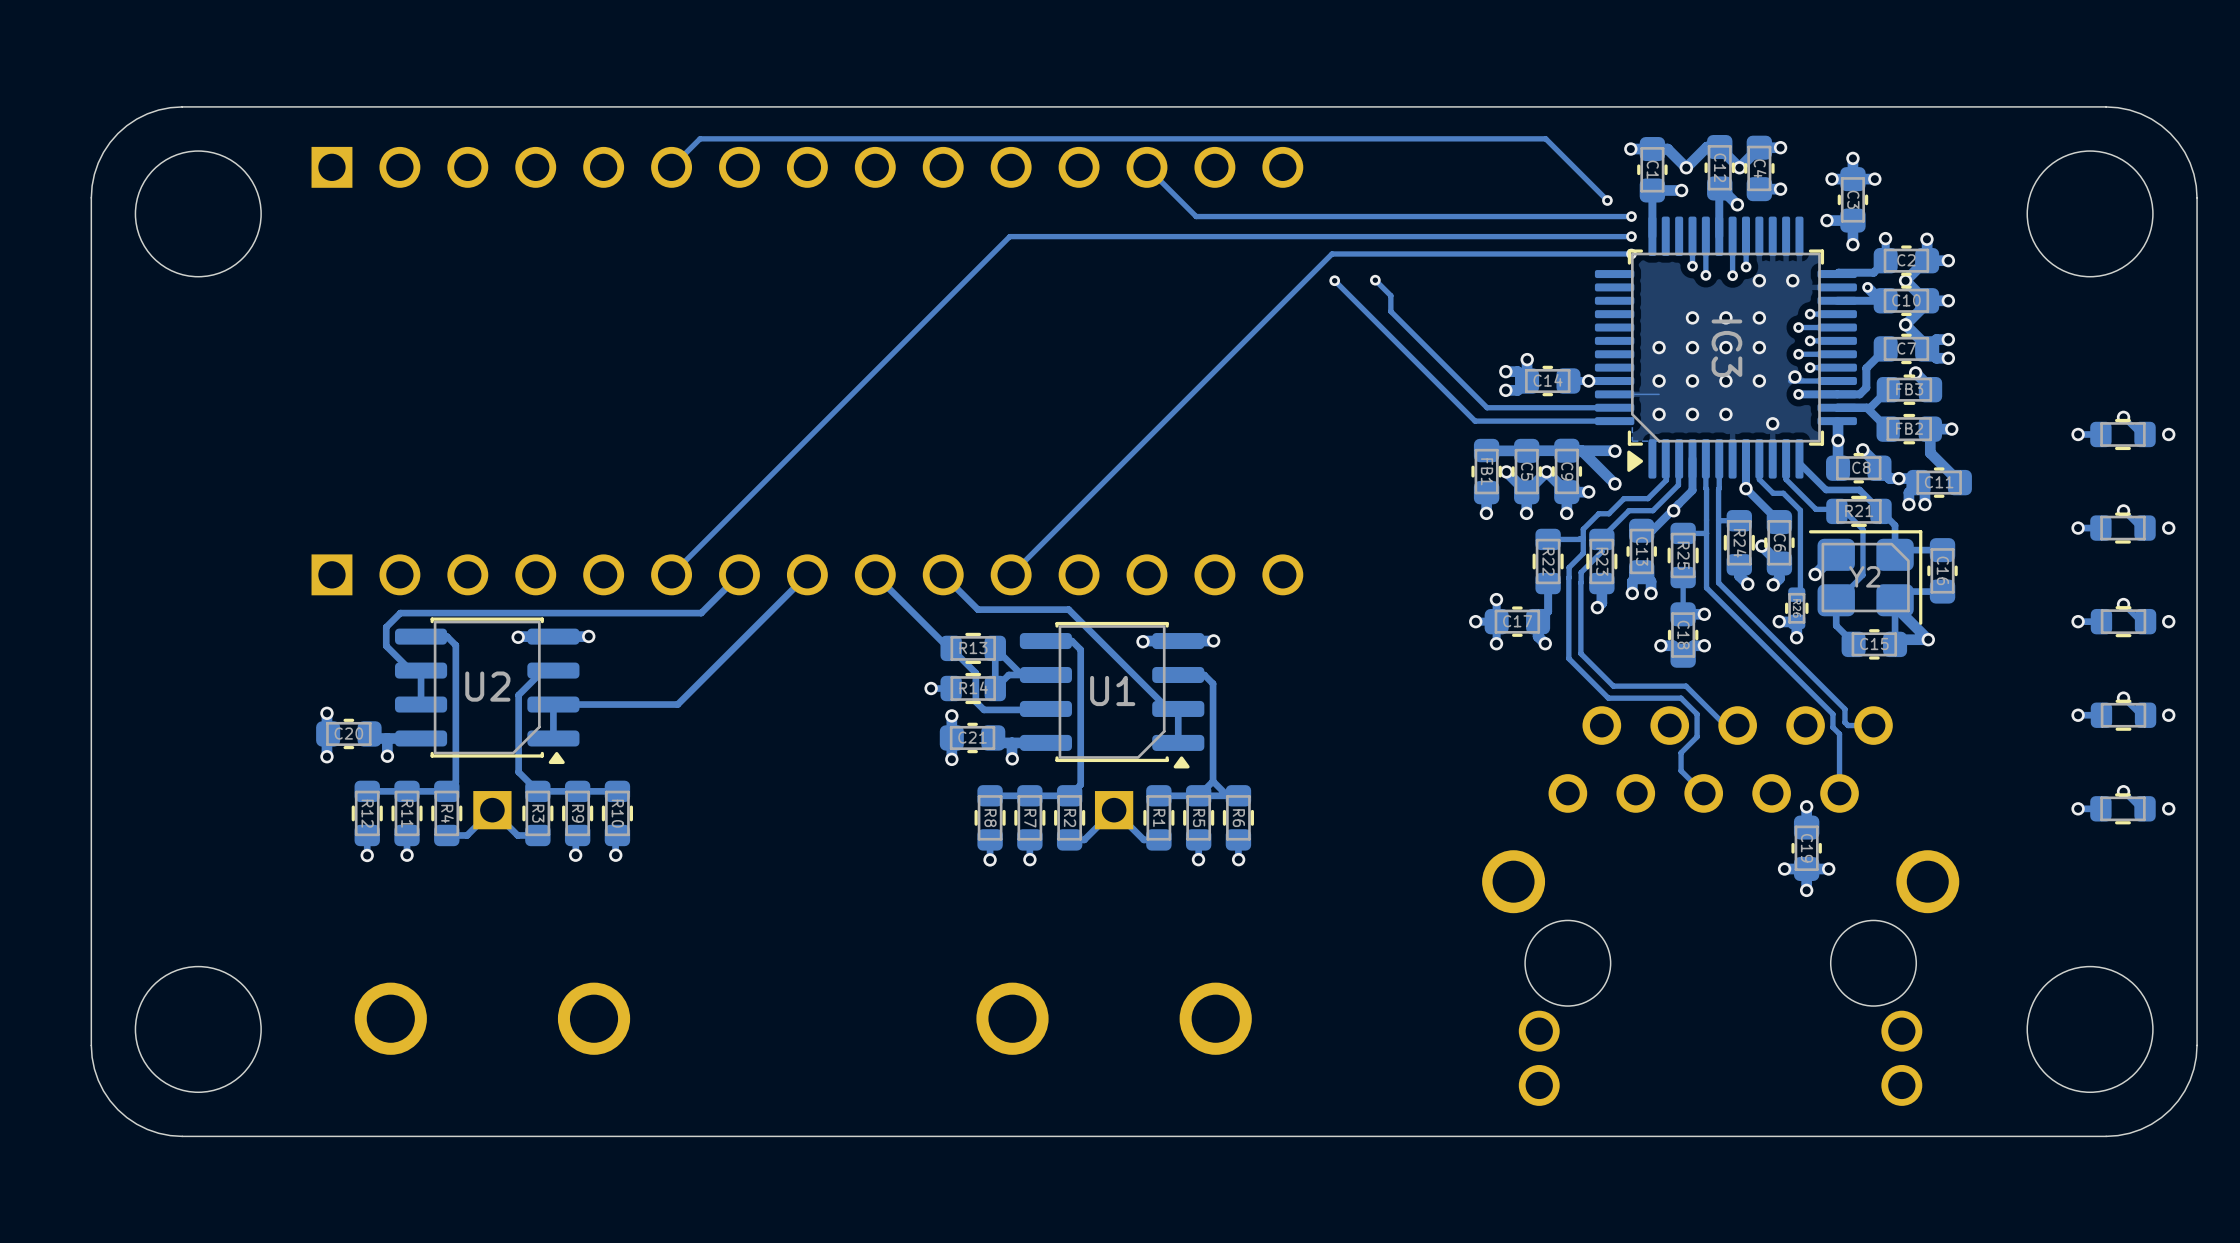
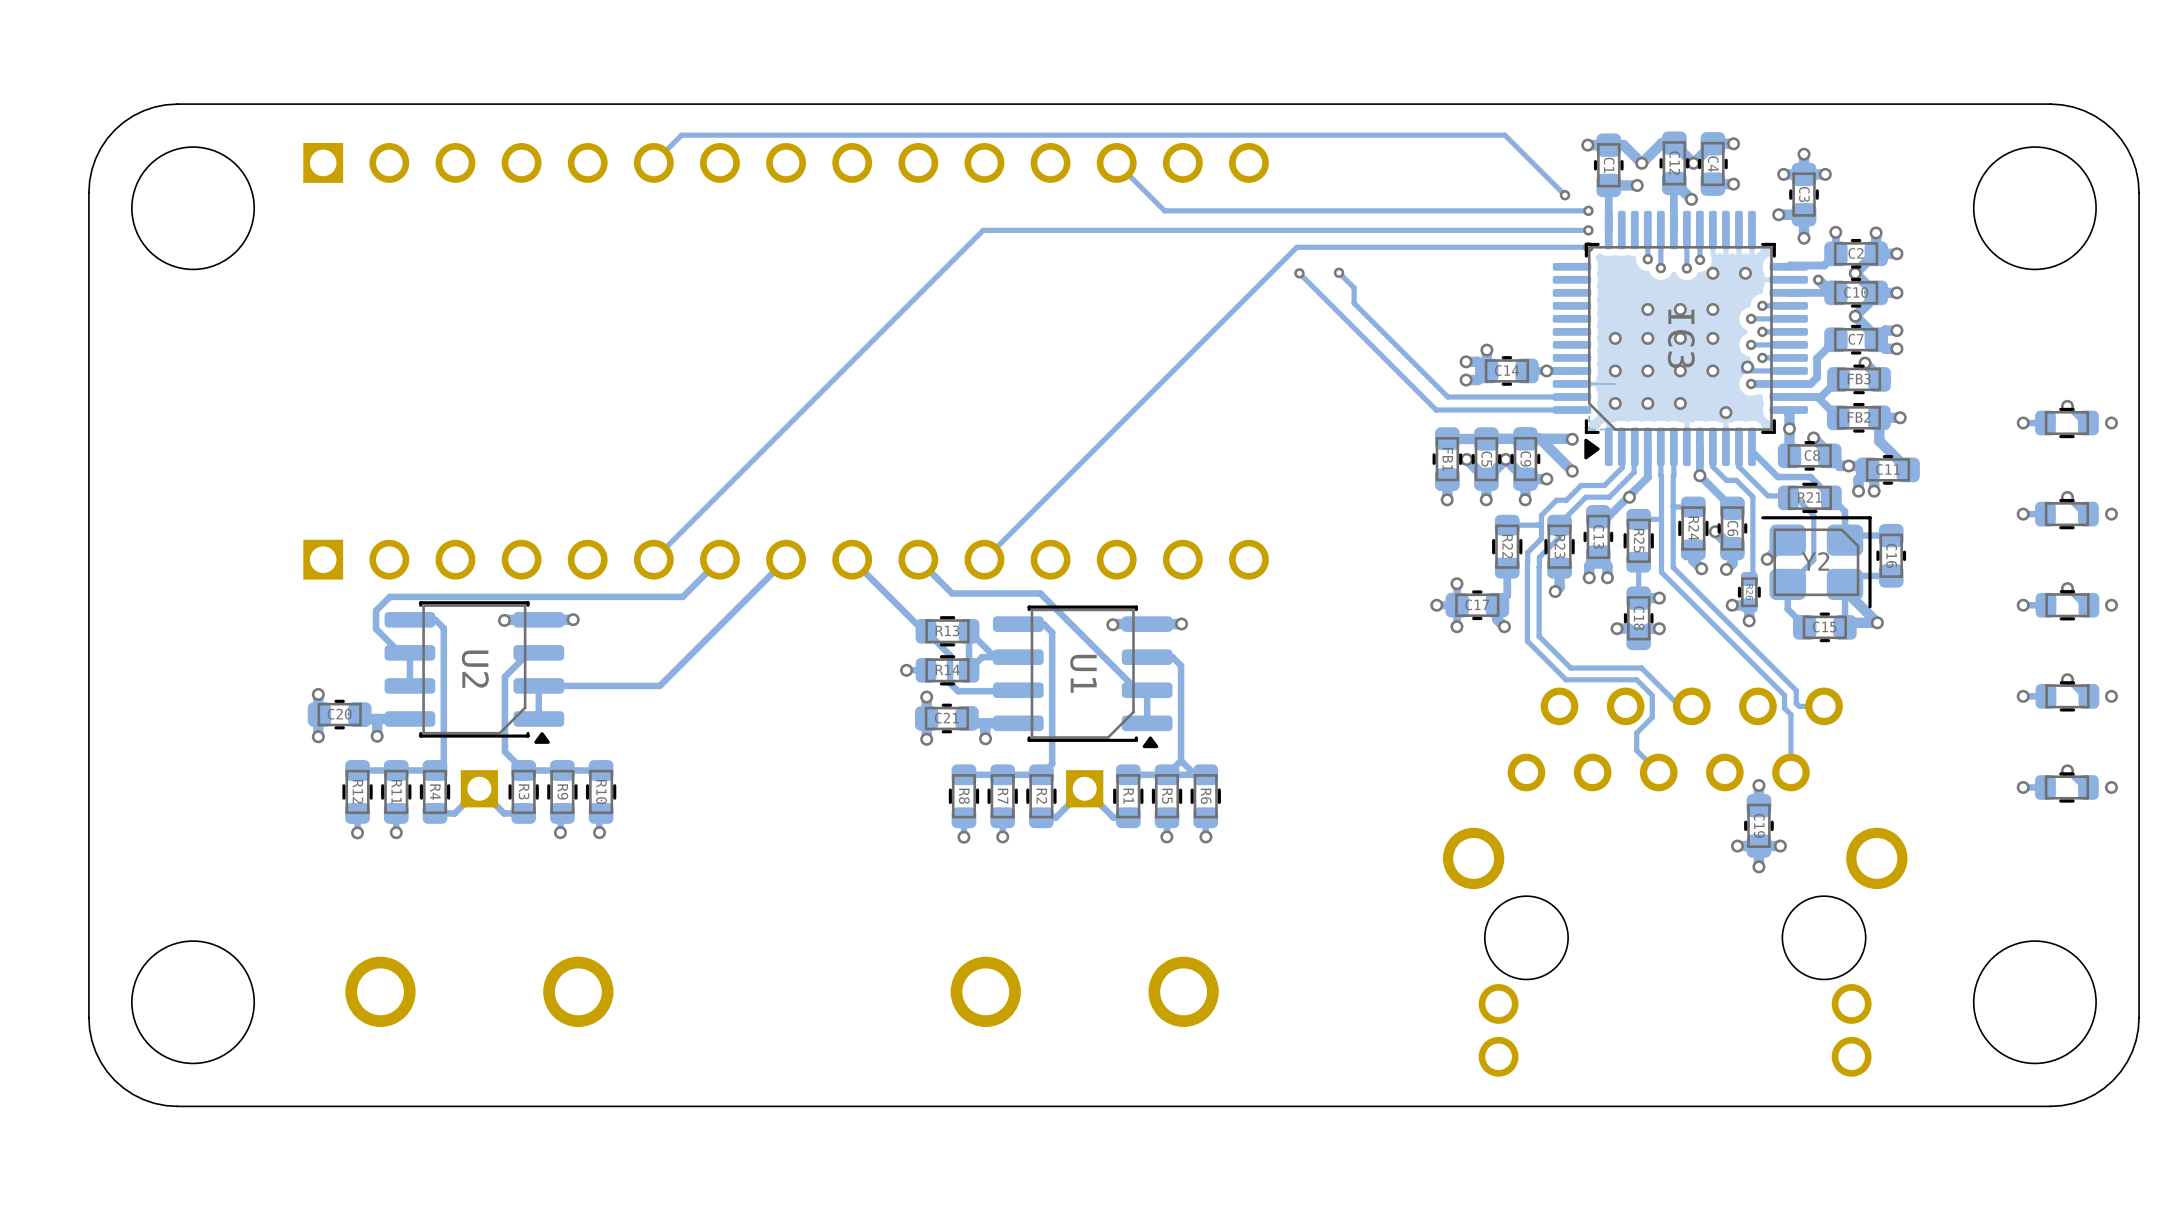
U2 name rotation: 0° (487, 686) -> 90° clockwise (475, 669)
U1 name rotation: 0° (1112, 691) -> 90° clockwise (1083, 673)

